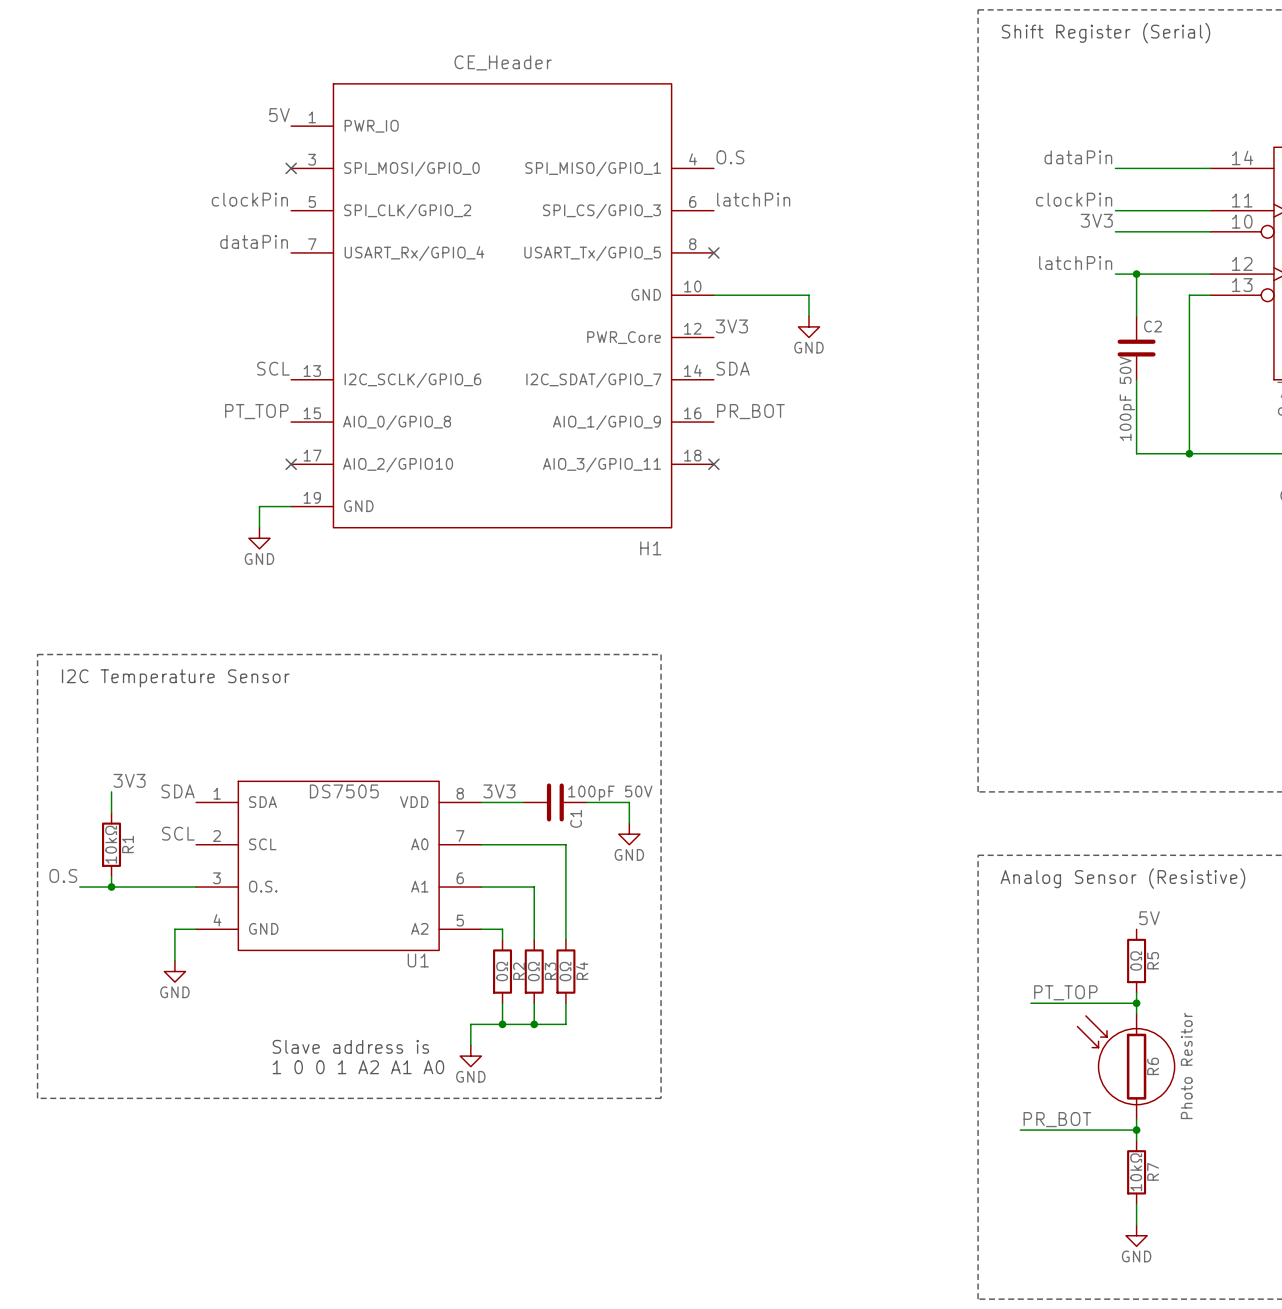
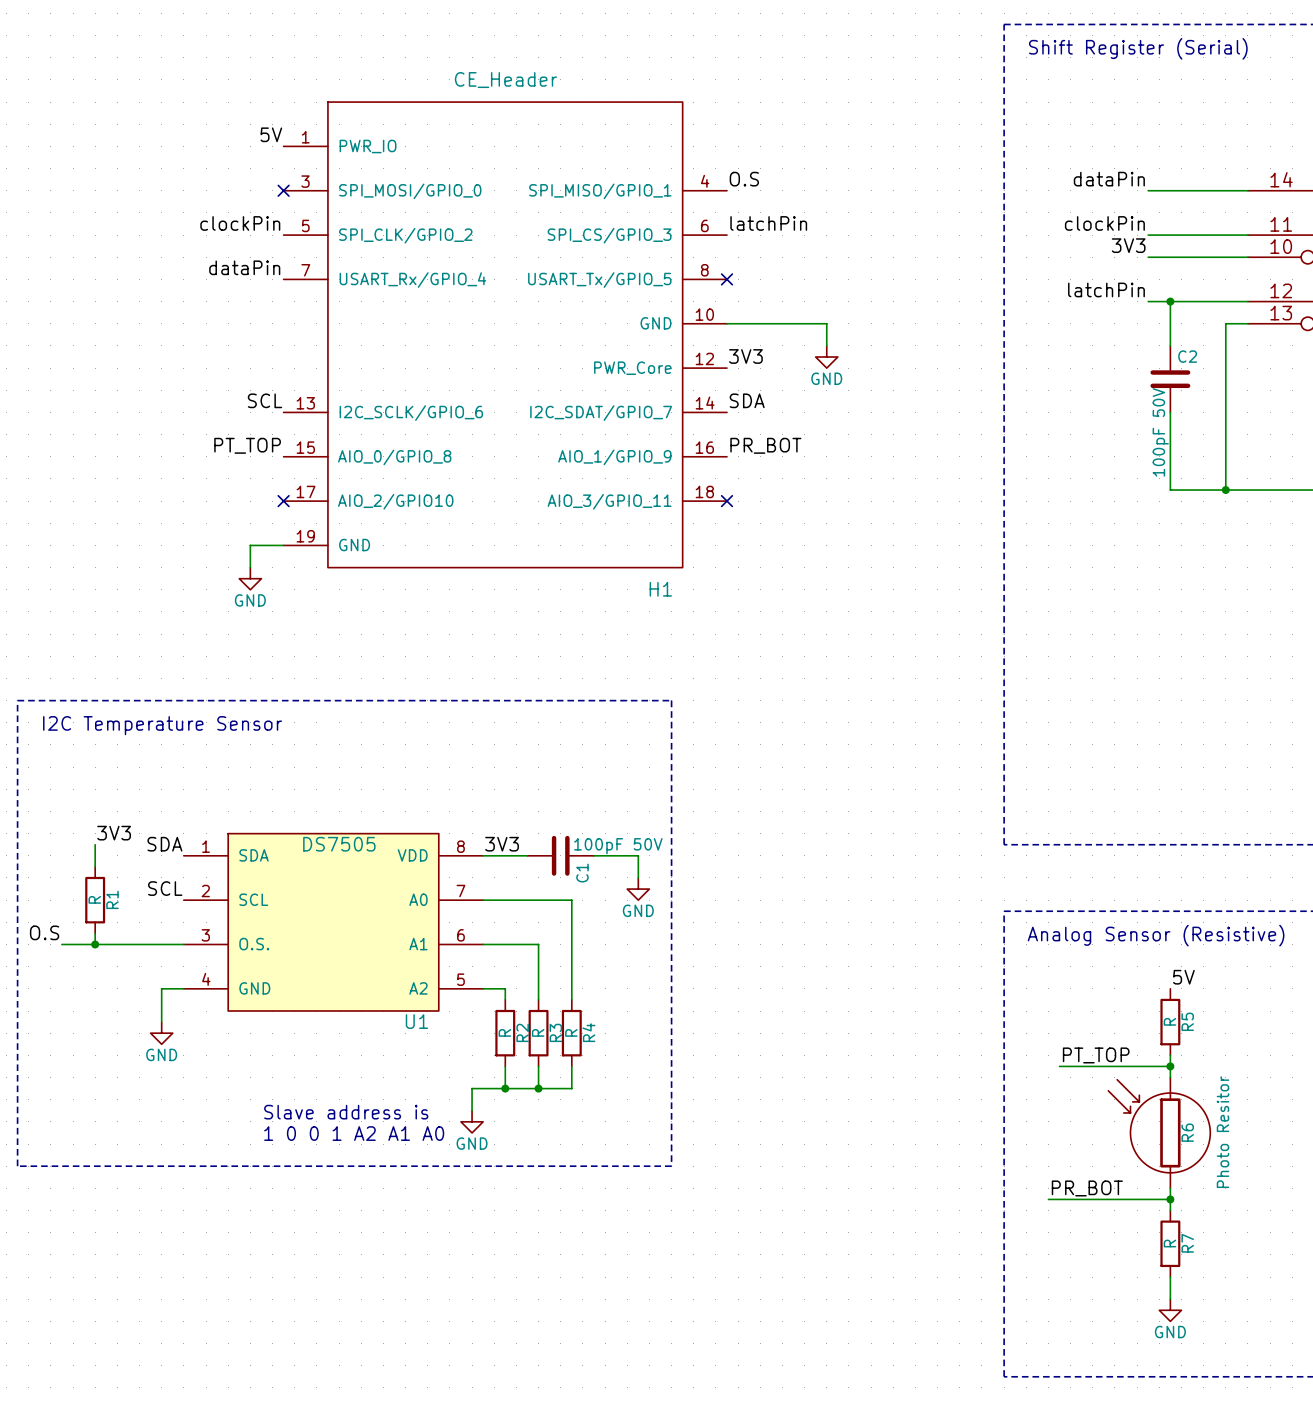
R1 value: 10kΩ (111, 844) -> R (94, 899)
R5 value: 0Ω (1136, 960) -> R (1169, 1021)
R2 value: 0Ω (502, 971) -> R (504, 1032)
R3 value: 0Ω (533, 971) -> R (538, 1032)
R4 value: 0Ω (565, 971) -> R (571, 1032)
R7 value: 10kΩ (1136, 1172) -> R (1169, 1243)

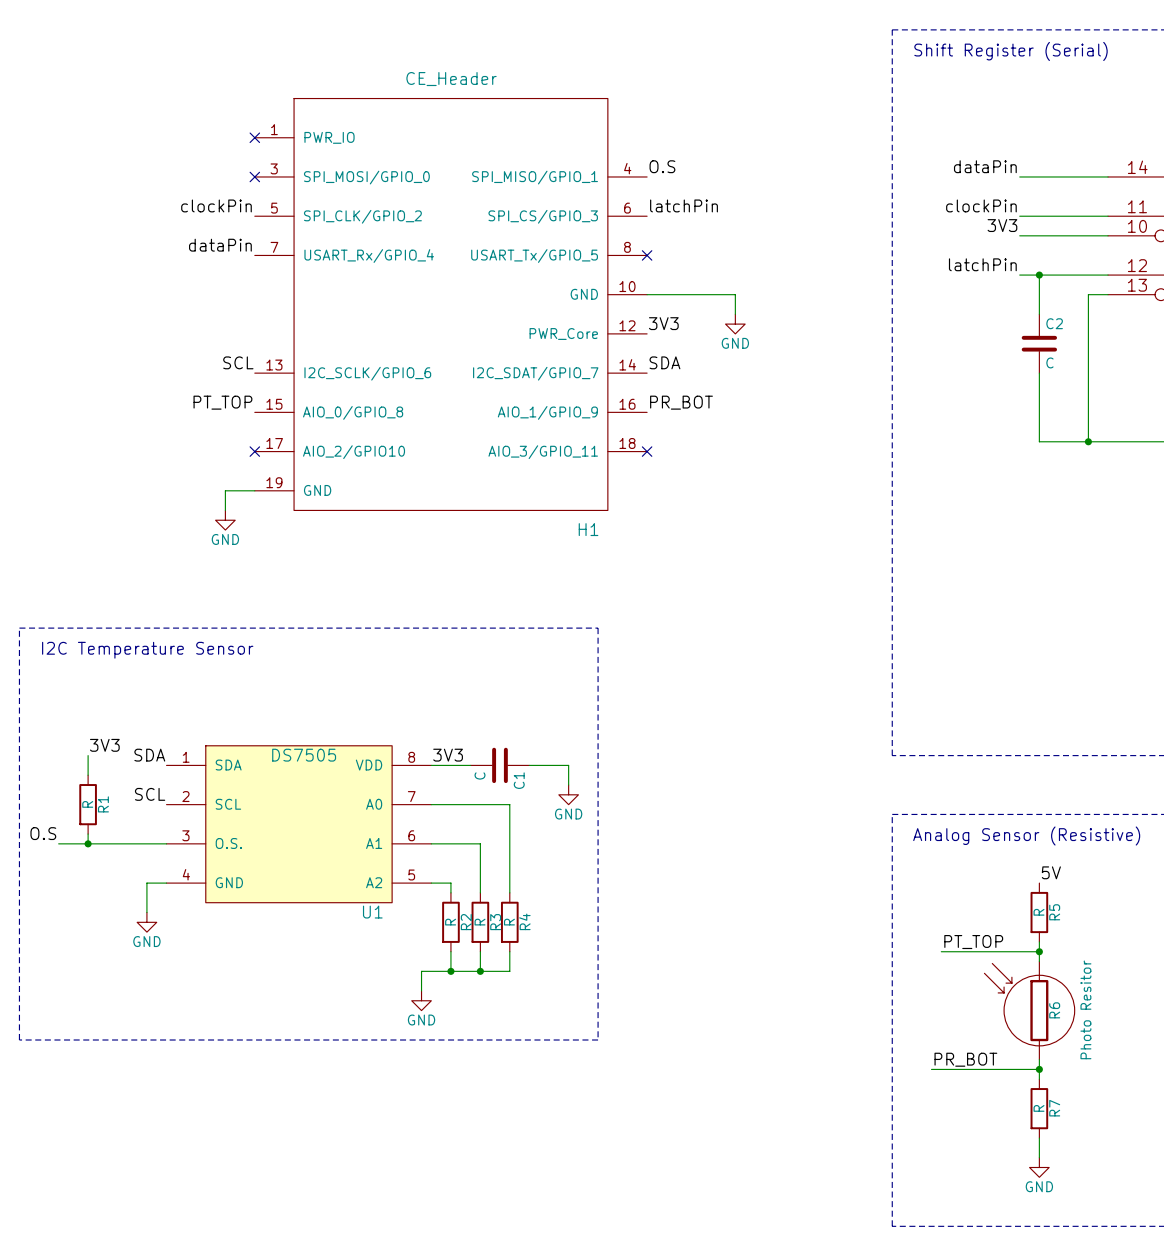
label: 5V (271, 134) -> none
no-connect mark: none -> (254, 137)
C2 value: 100pF 50V (1160, 432) -> C (1049, 362)
C1 value: 100pF 50V (618, 846) -> C (480, 775)
text: Slave address is (346, 1112) -> none
text: 1 0 0 1 A2 A1 A0 (354, 1133) -> none

